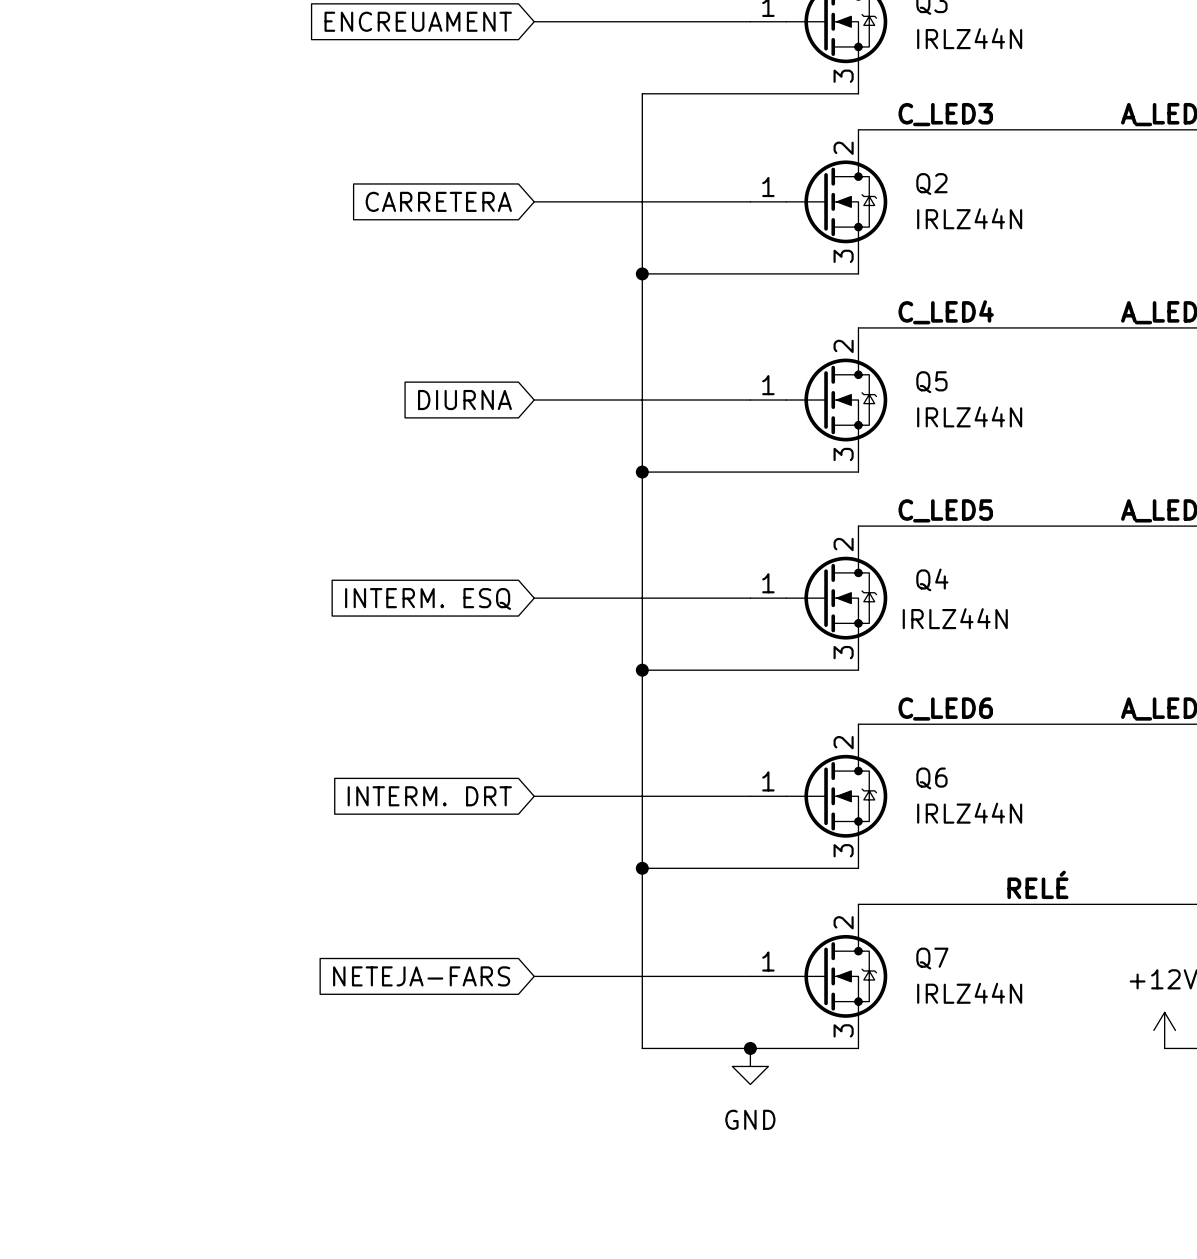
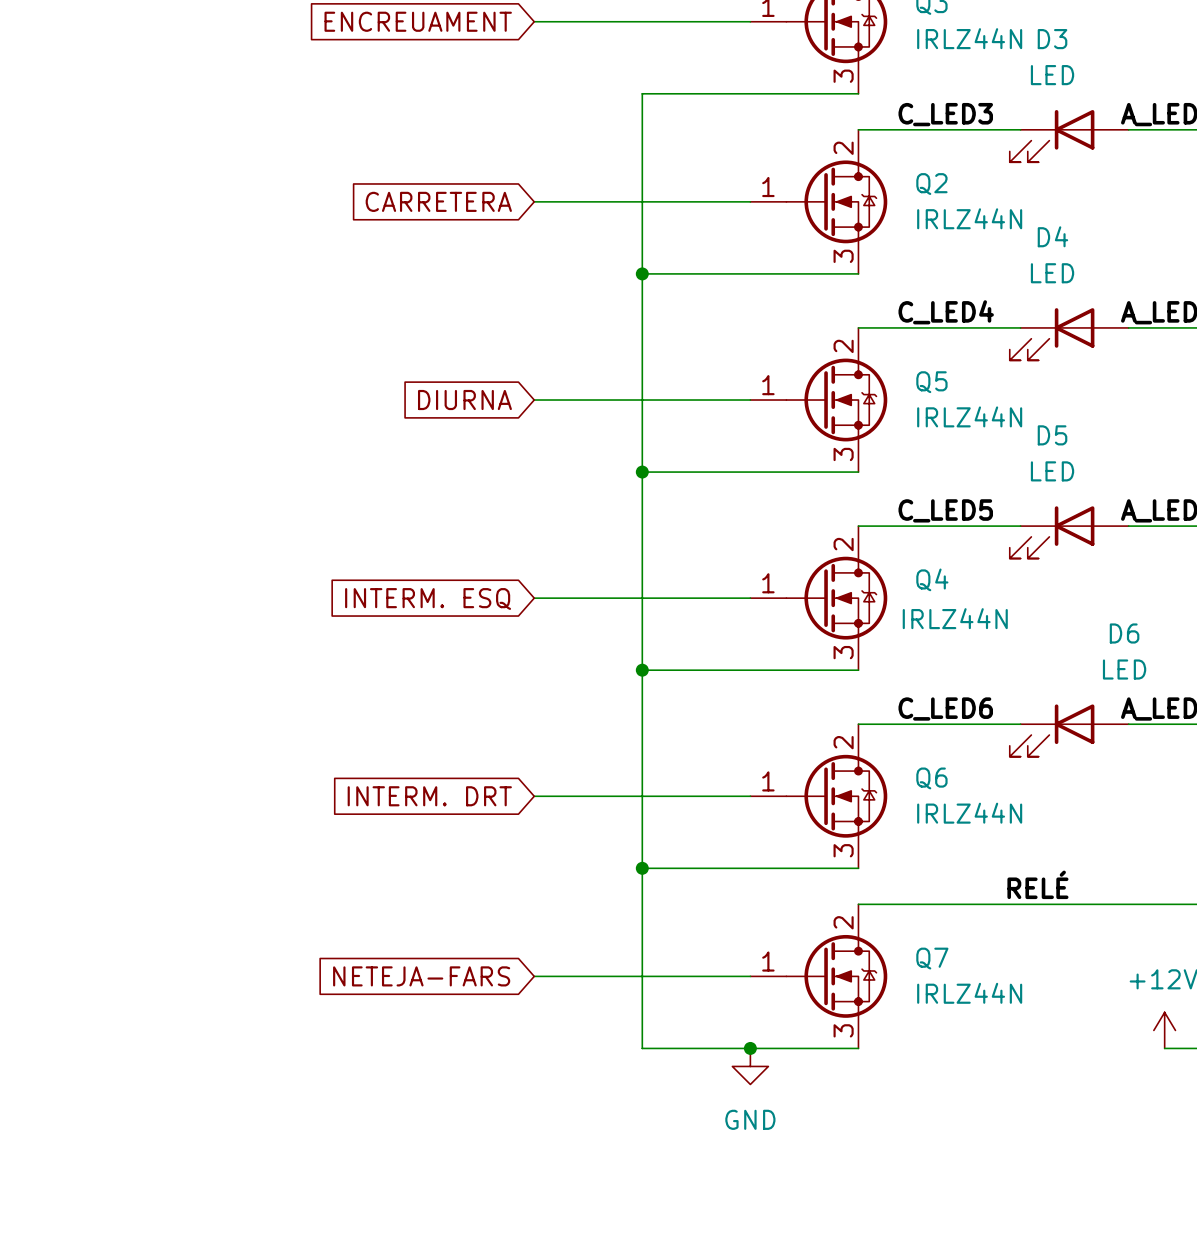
D3: none -> LED (1069, 136)
D4: none -> LED (1069, 334)
D5: none -> LED (1069, 532)
D6: none -> LED (1069, 730)

